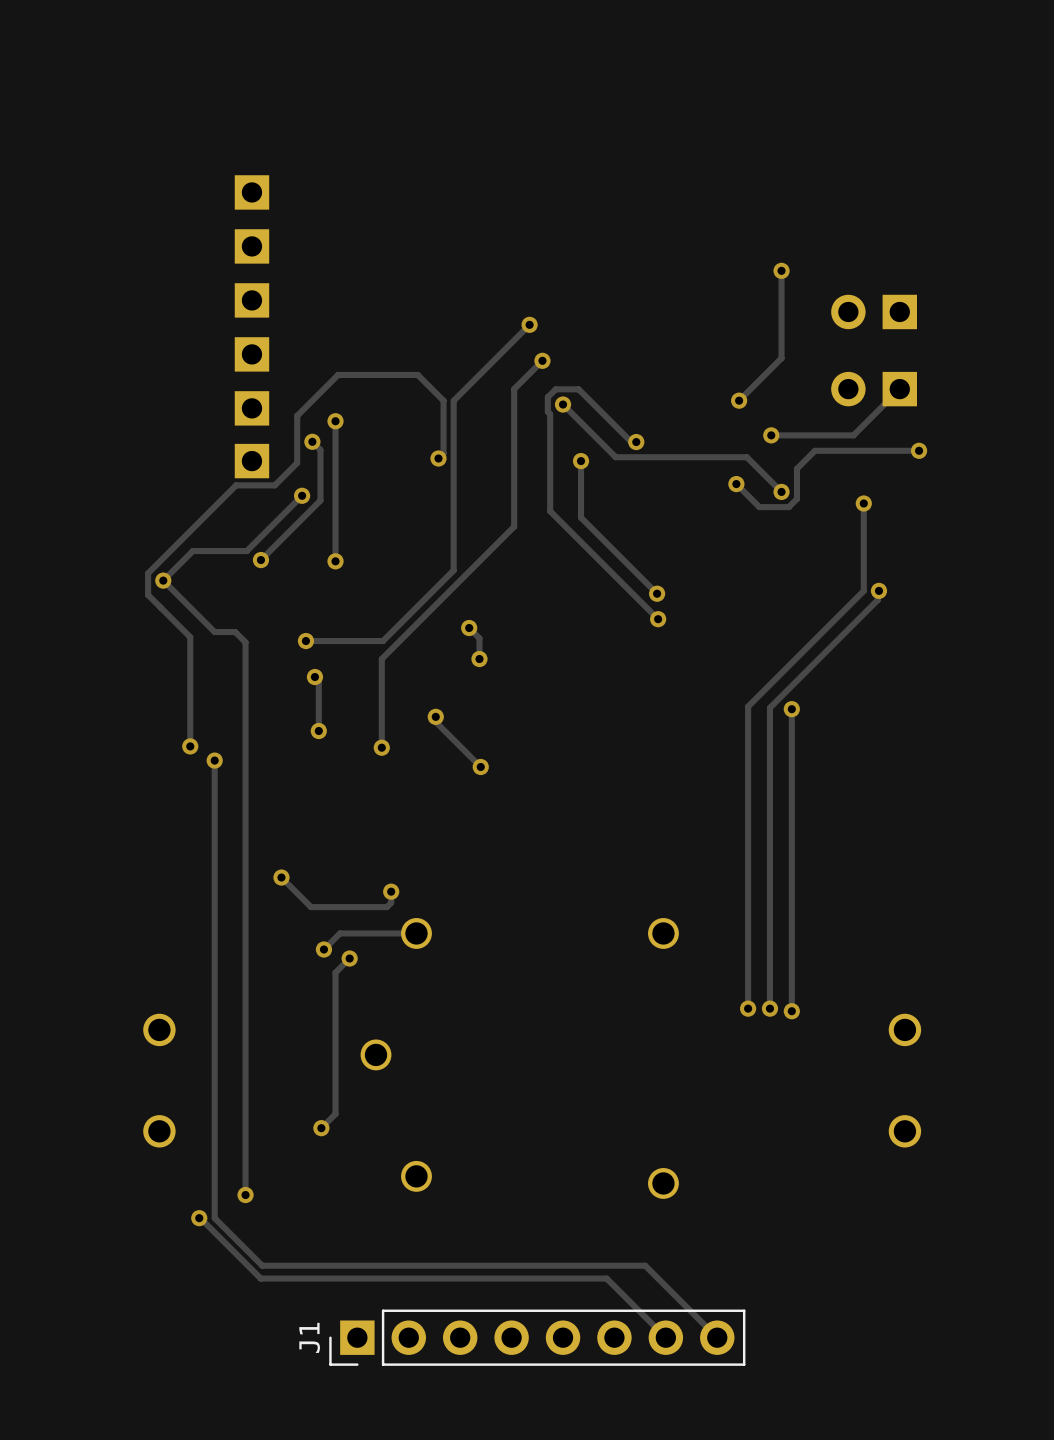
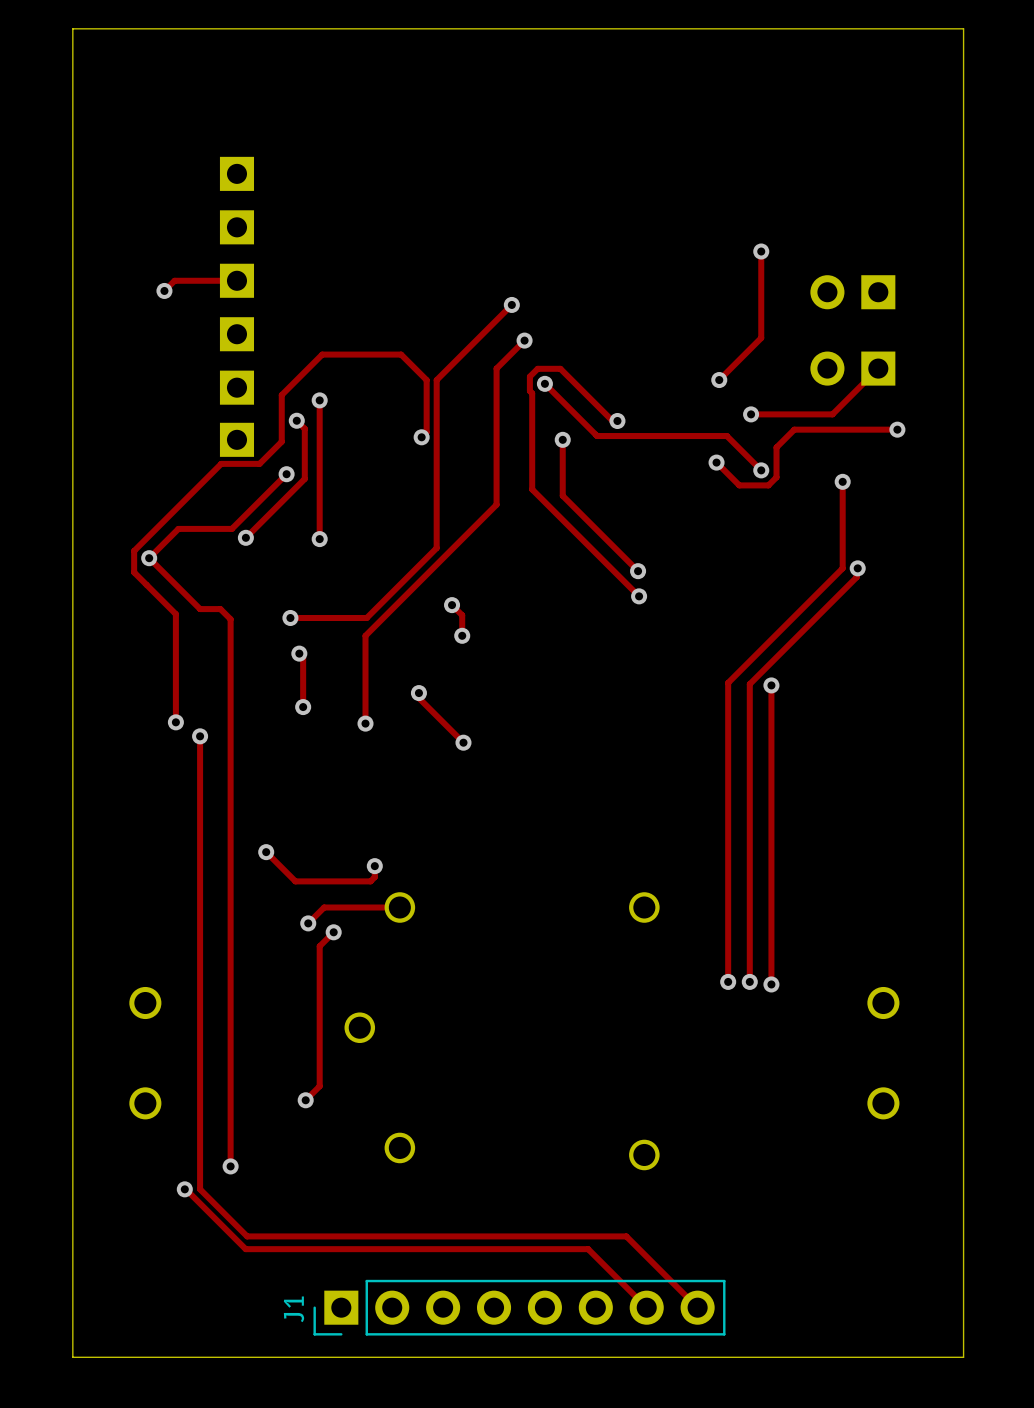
board edge: none -> (72, 28) (72, 1357) (963, 1357) (963, 28) (72, 28)
track: none -> (236, 280) (174, 280) (164, 290)
via: none -> (164, 290)

